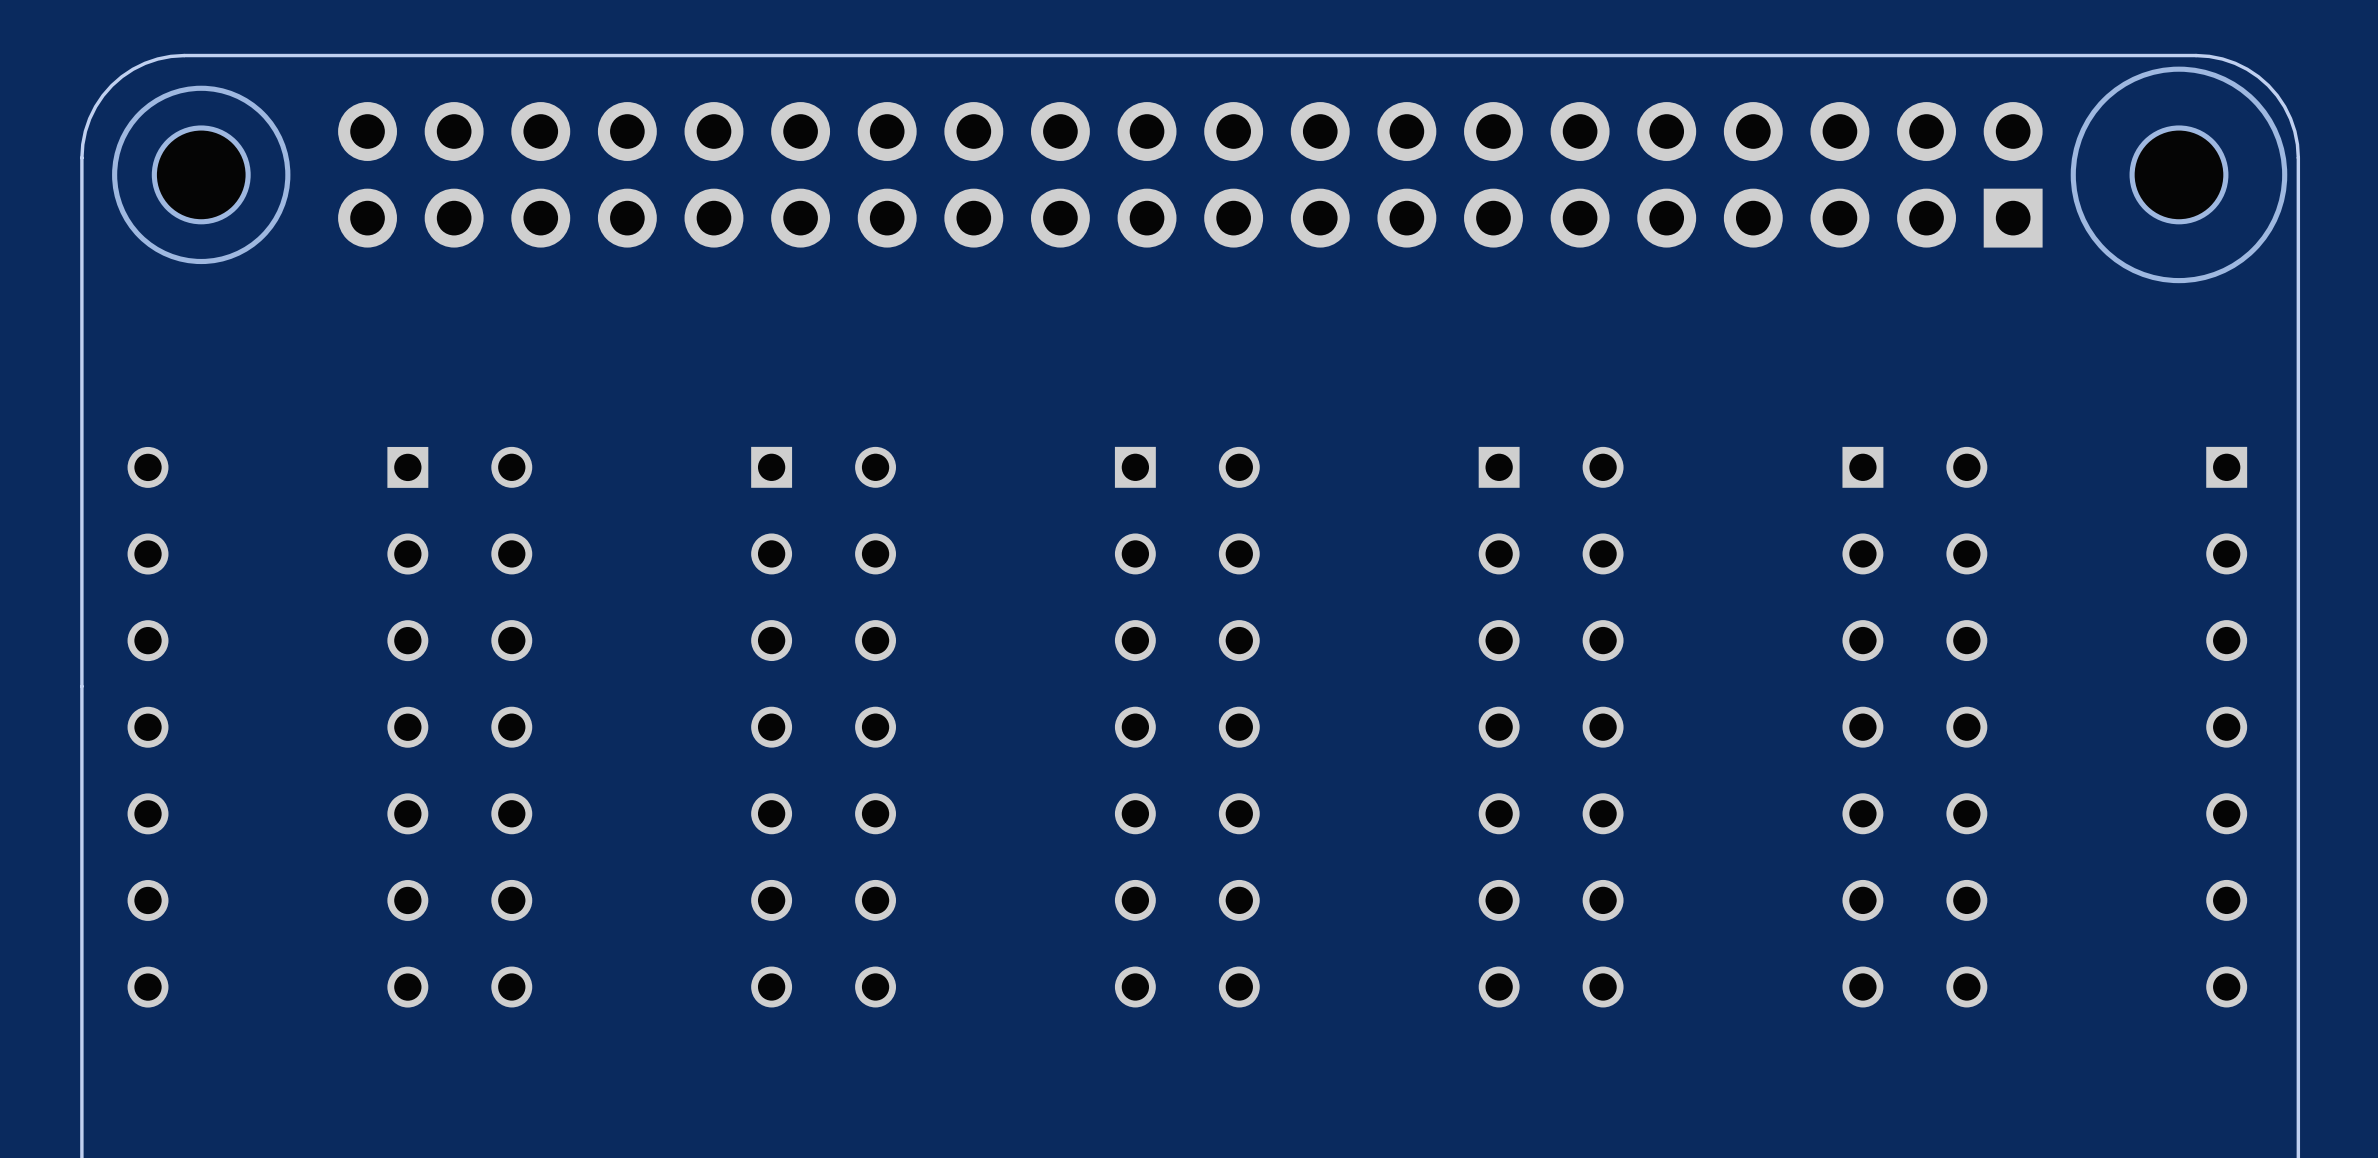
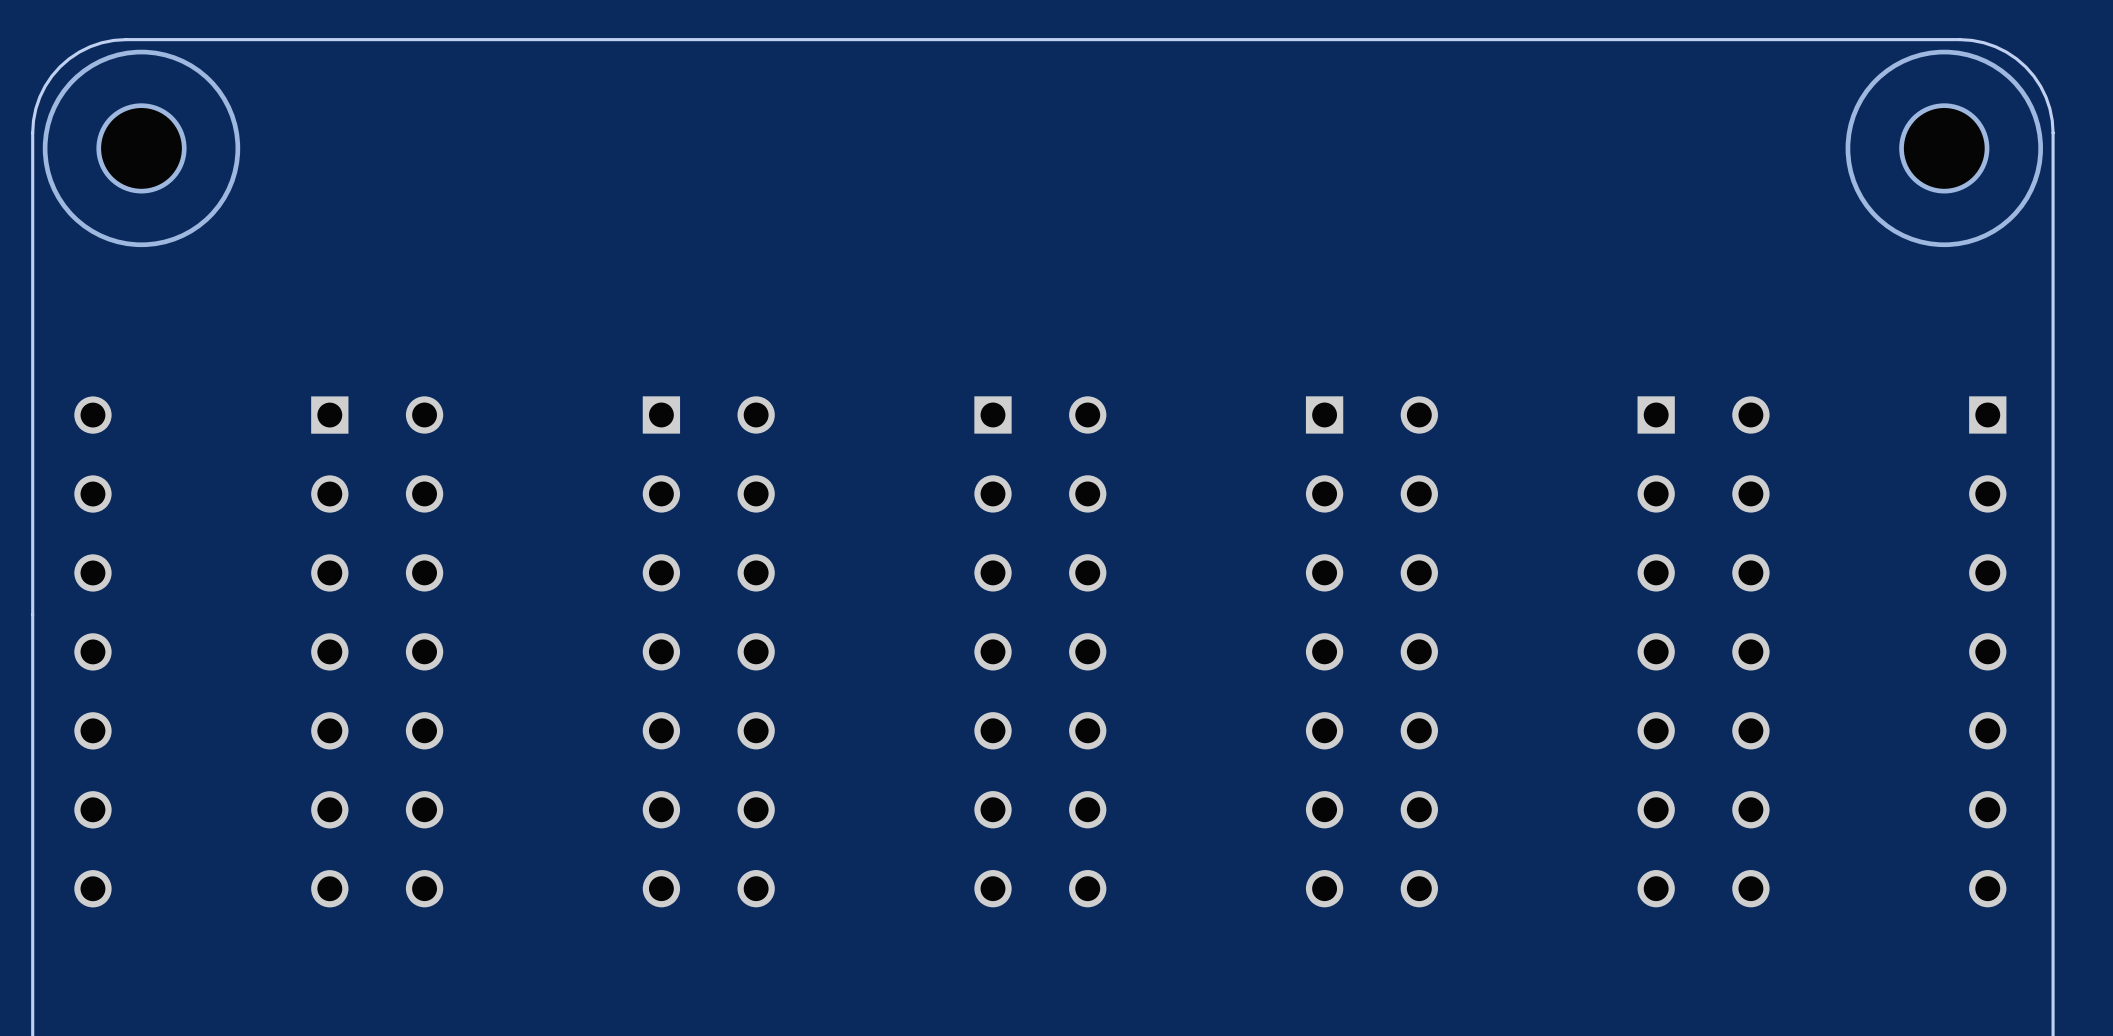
part footprint: [112, 85, 291, 265] -> [42, 49, 241, 248]
part: (1190, 174) -> none

